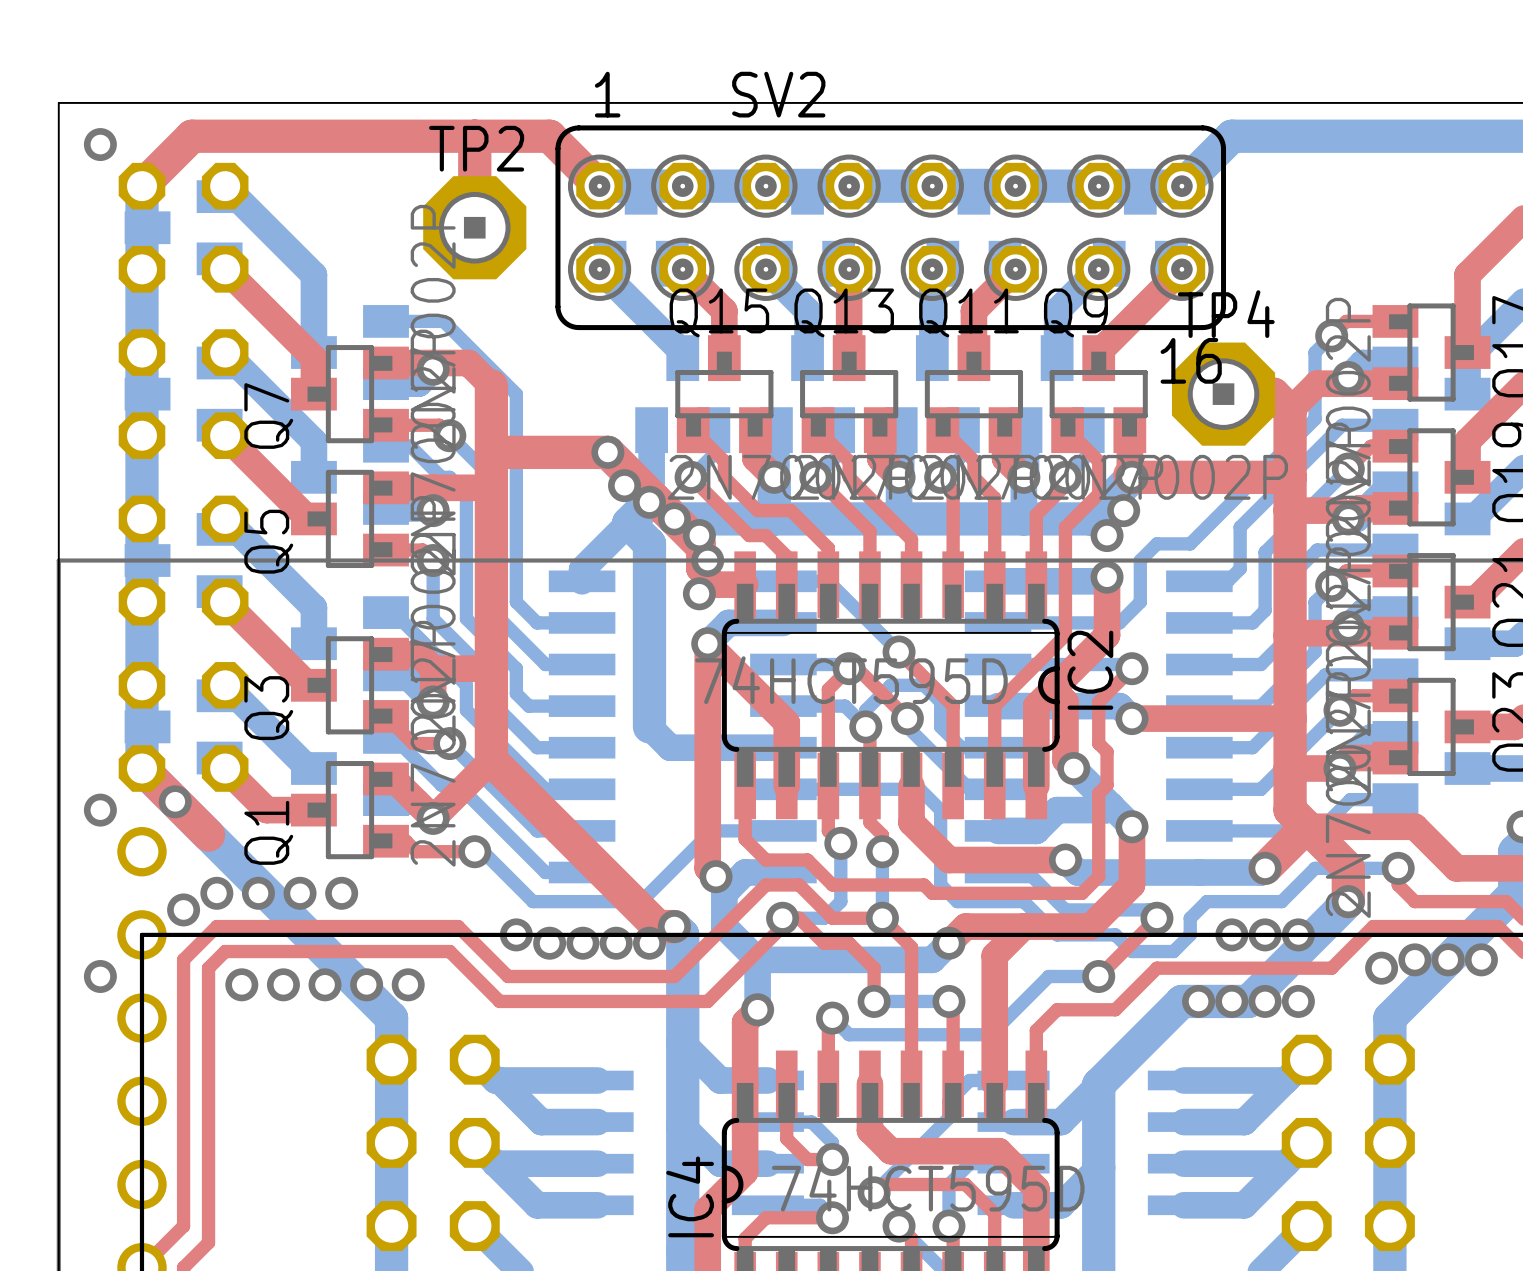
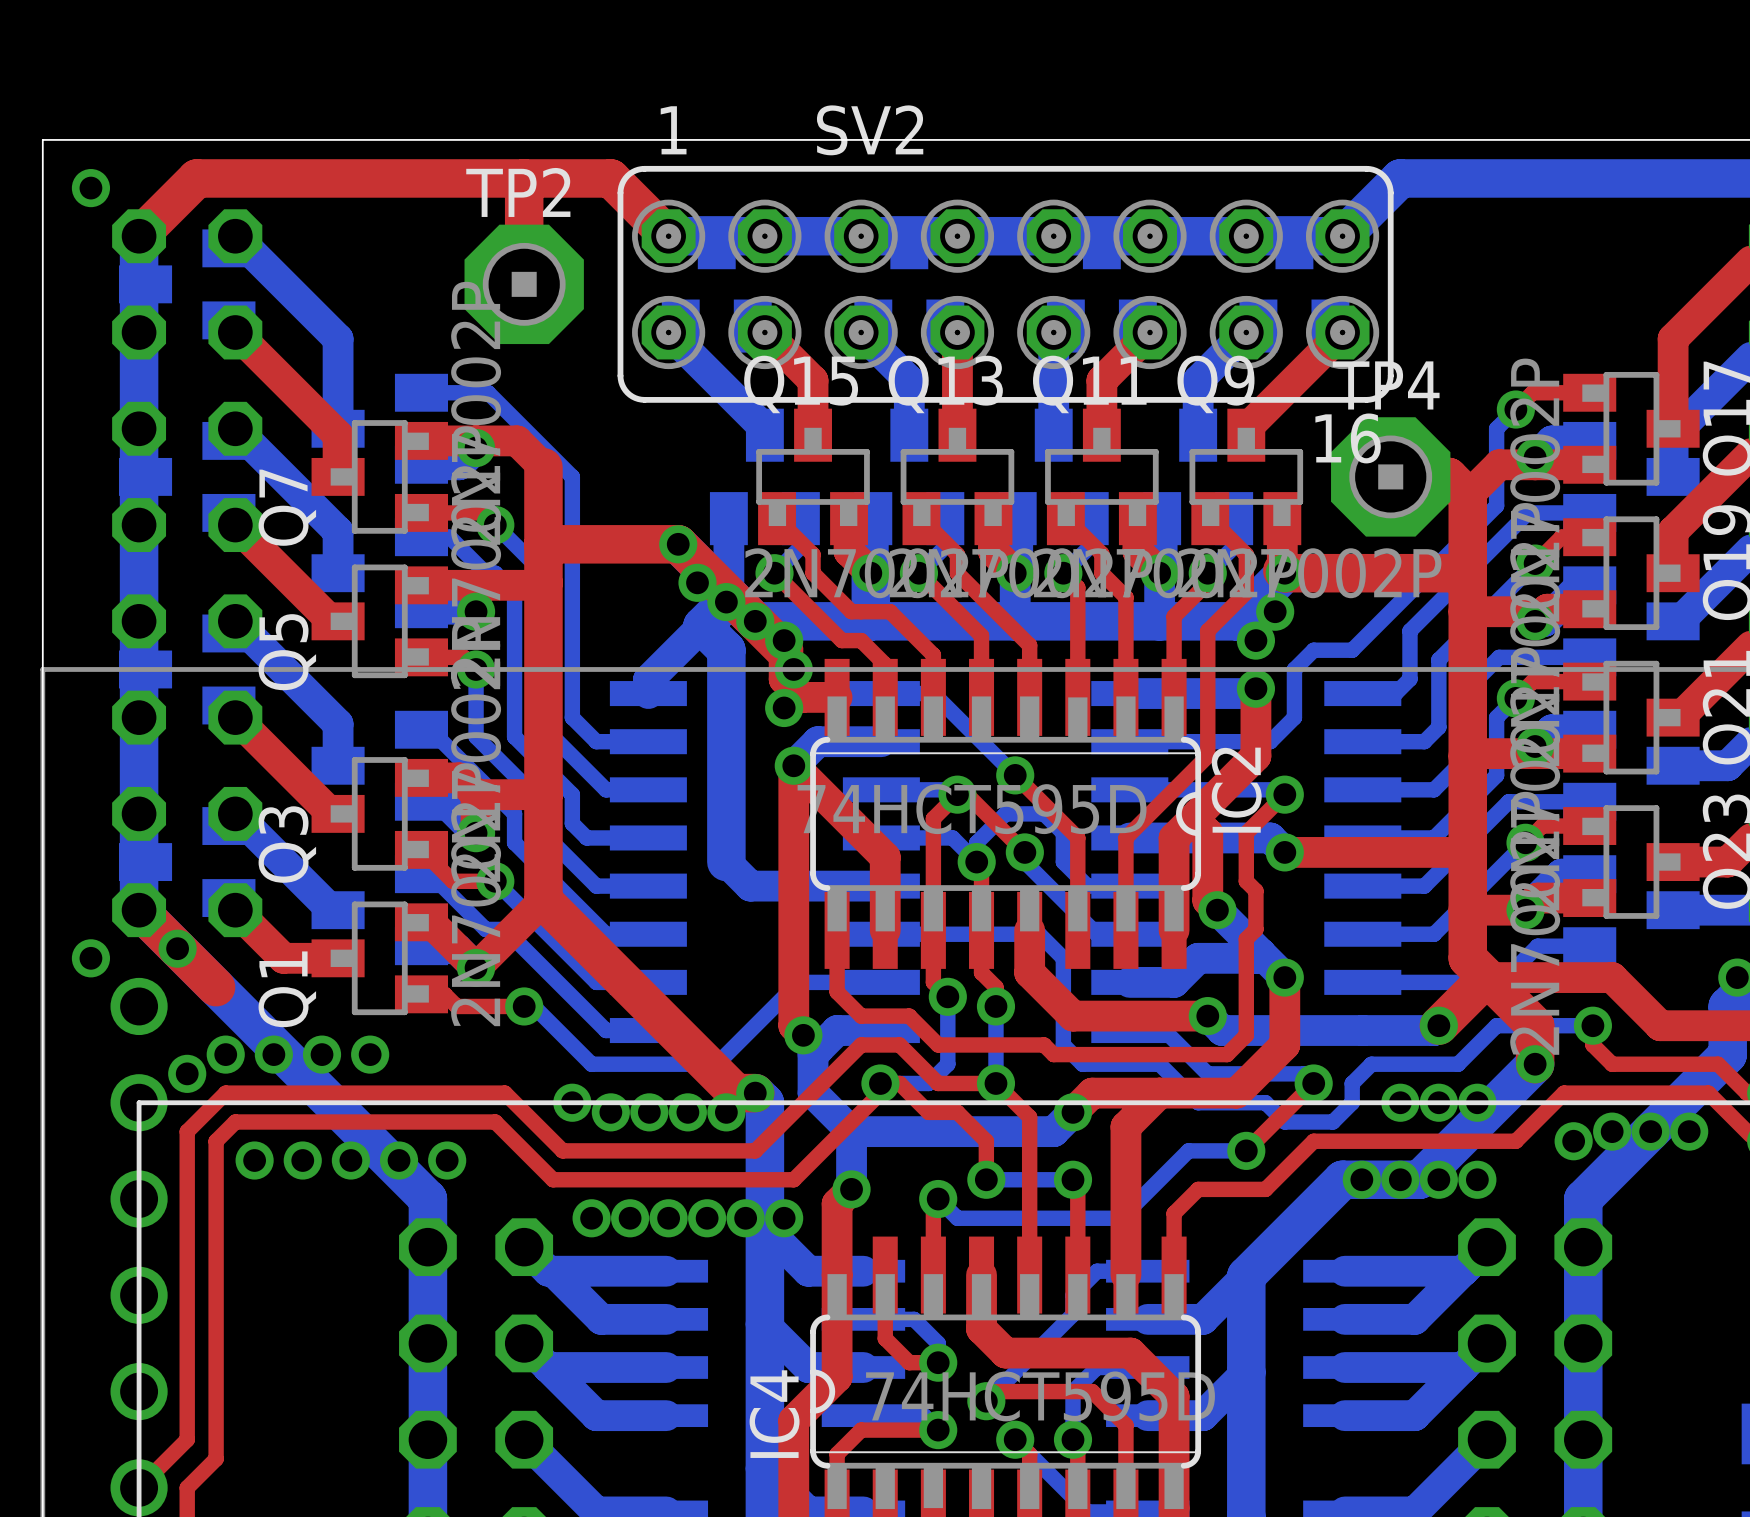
via: (100, 976) -> none
via: none -> (591, 1218)
via: none -> (630, 1218)
via: none -> (668, 1218)
via: none -> (707, 1218)
via: none -> (745, 1218)
via: none -> (784, 1218)

